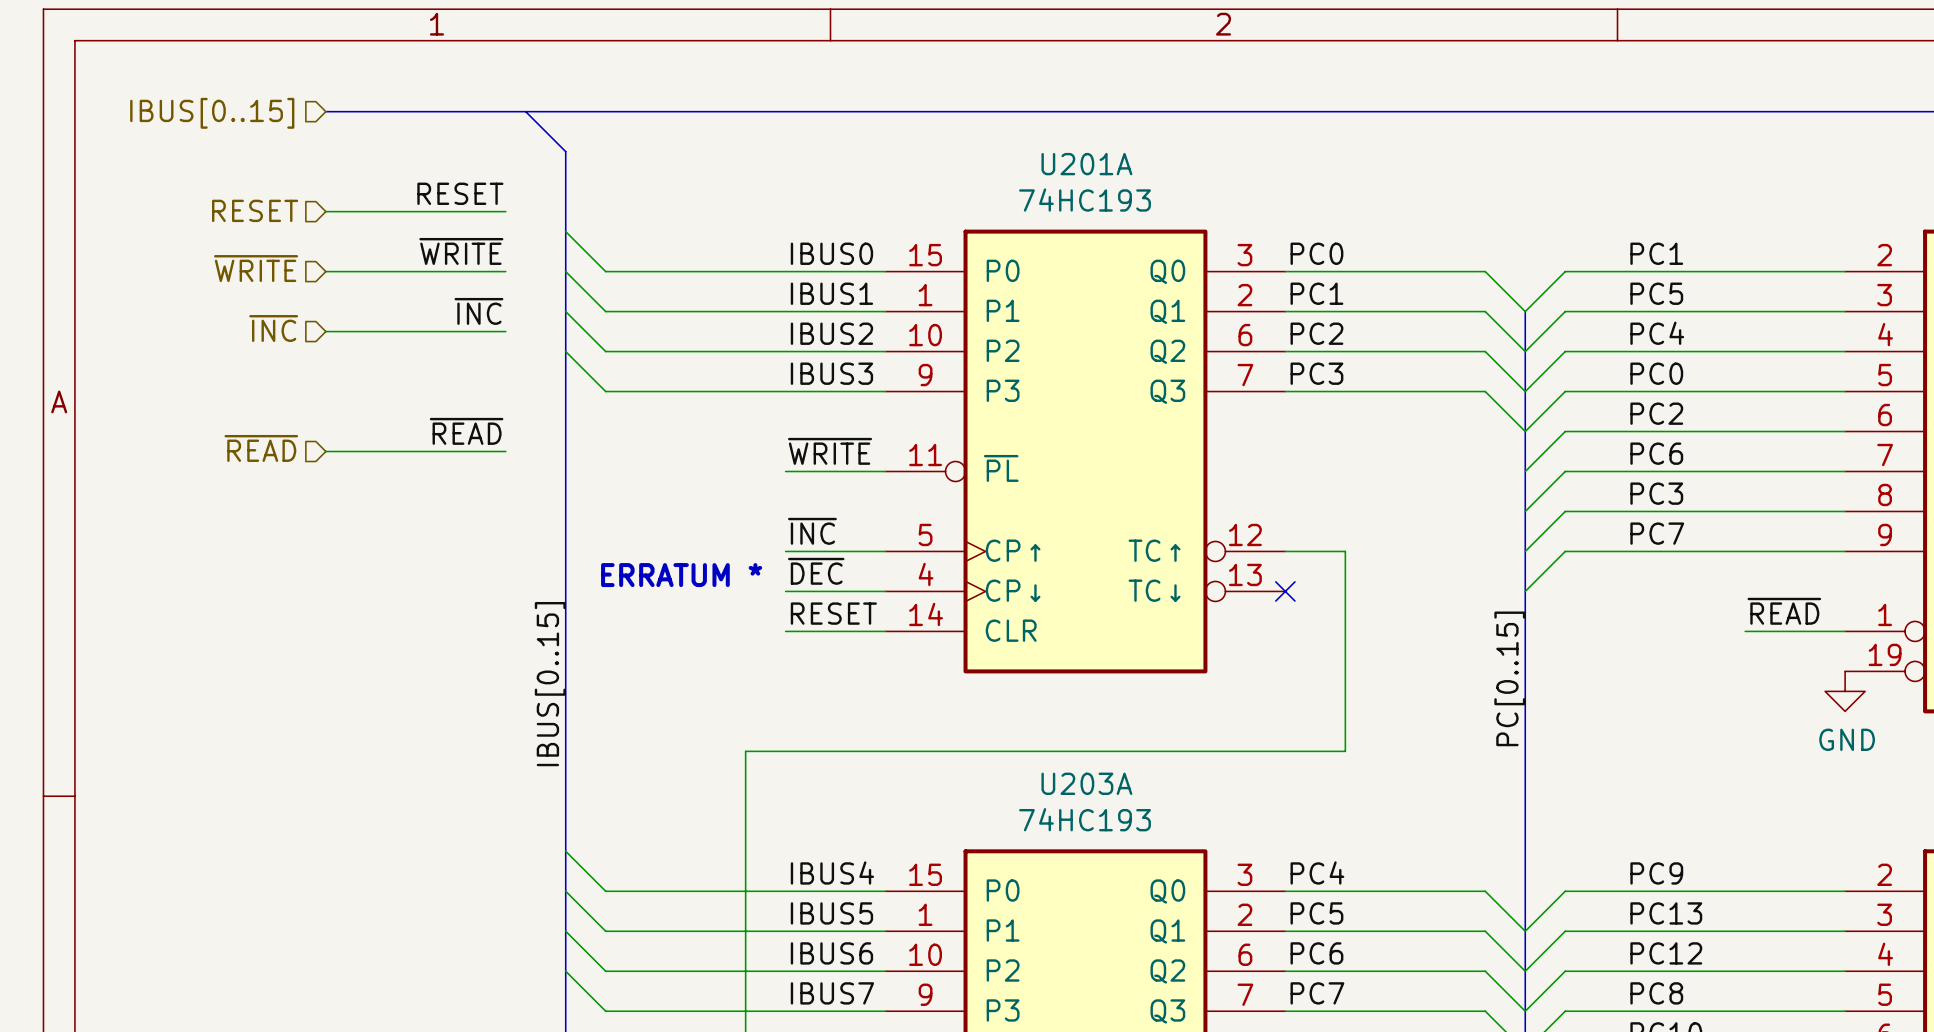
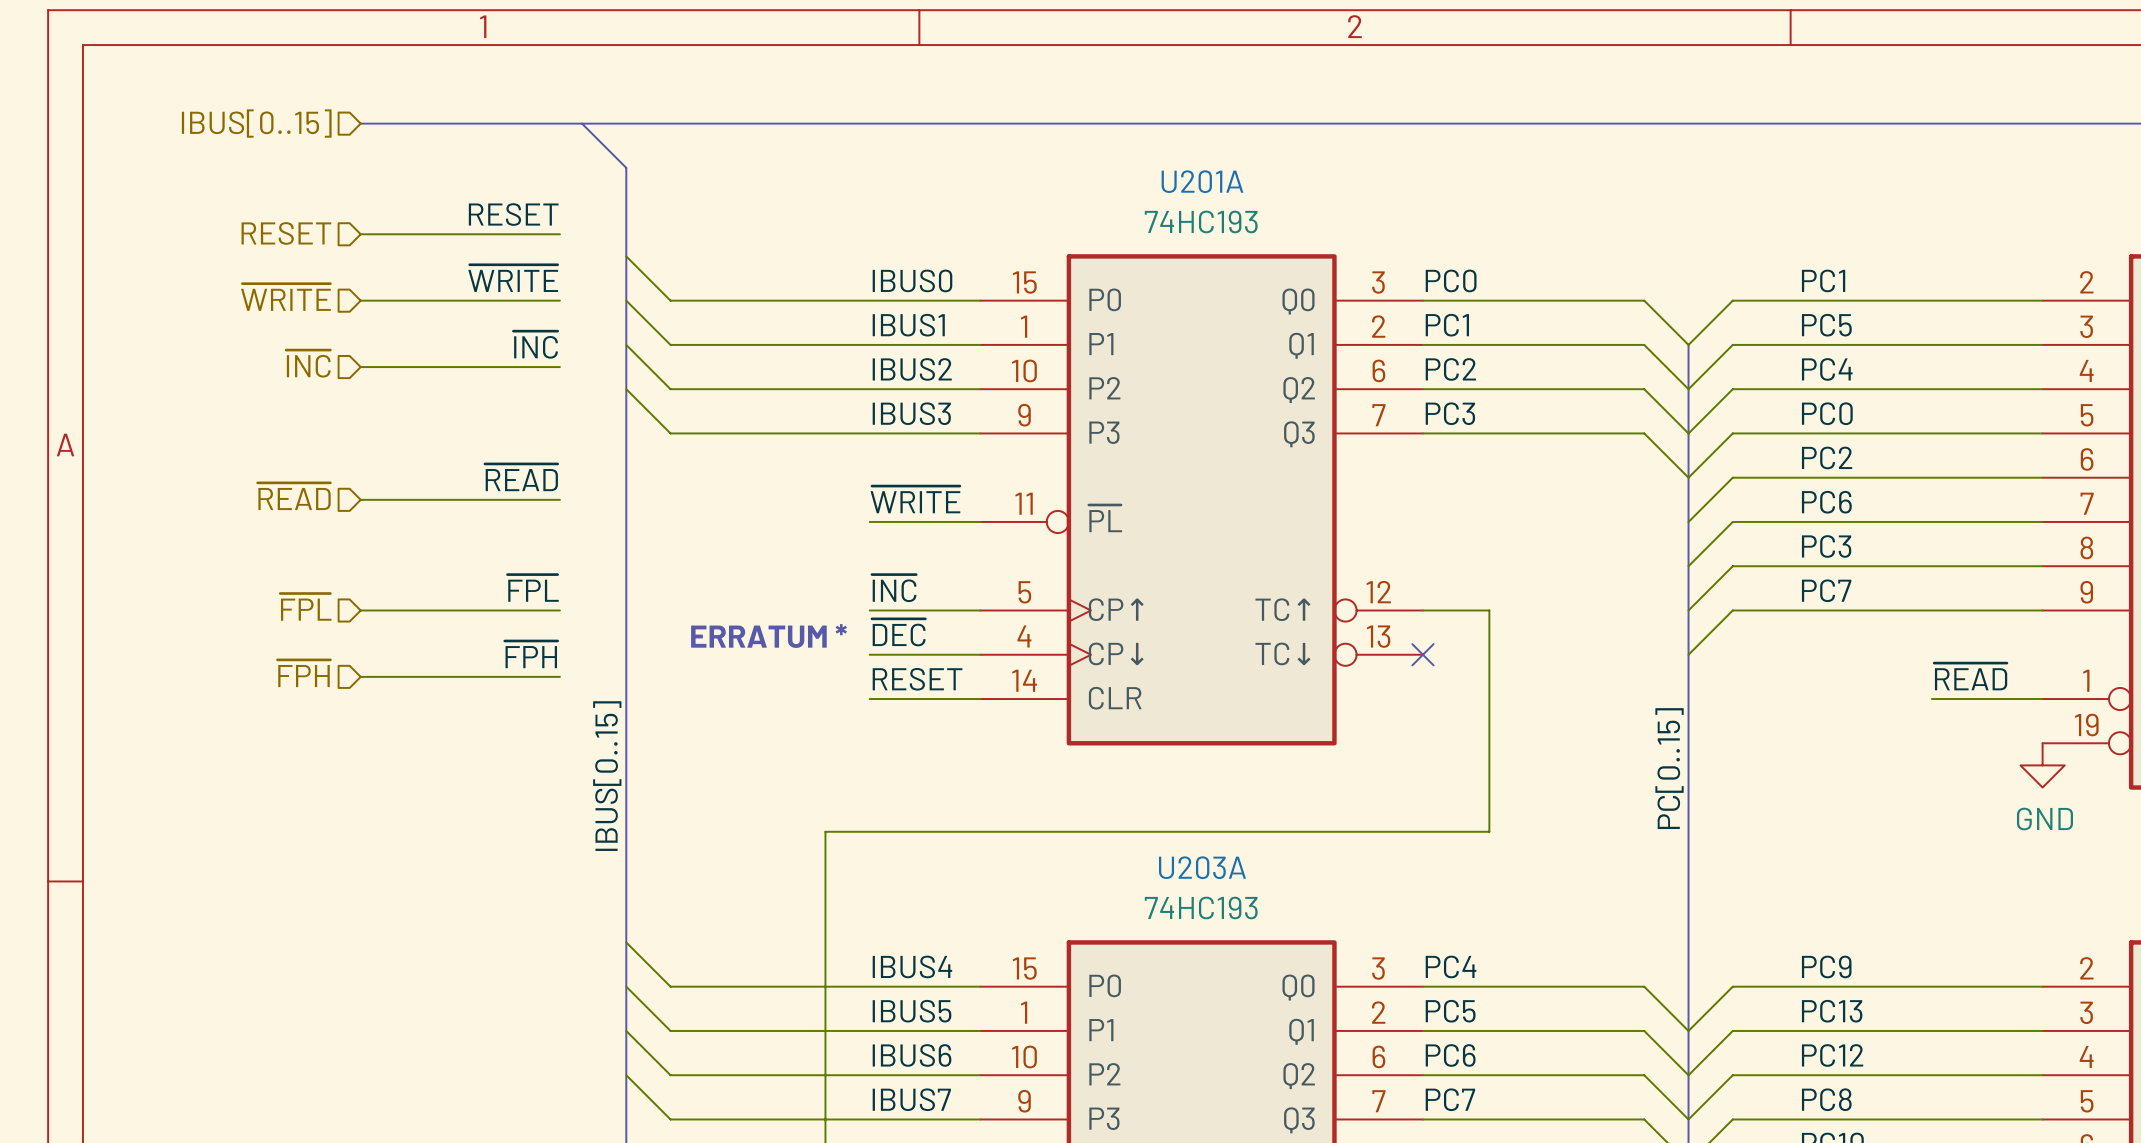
label: none -> ~{FPL} (533, 588)
hierarchical label: none -> ~{FPL} (305, 607)
wire: none -> (360, 610) (559, 610)
label: none -> ~{FPH} (531, 654)
hierarchical label: none -> ~{FPH} (303, 673)
wire: none -> (360, 676) (559, 676)

